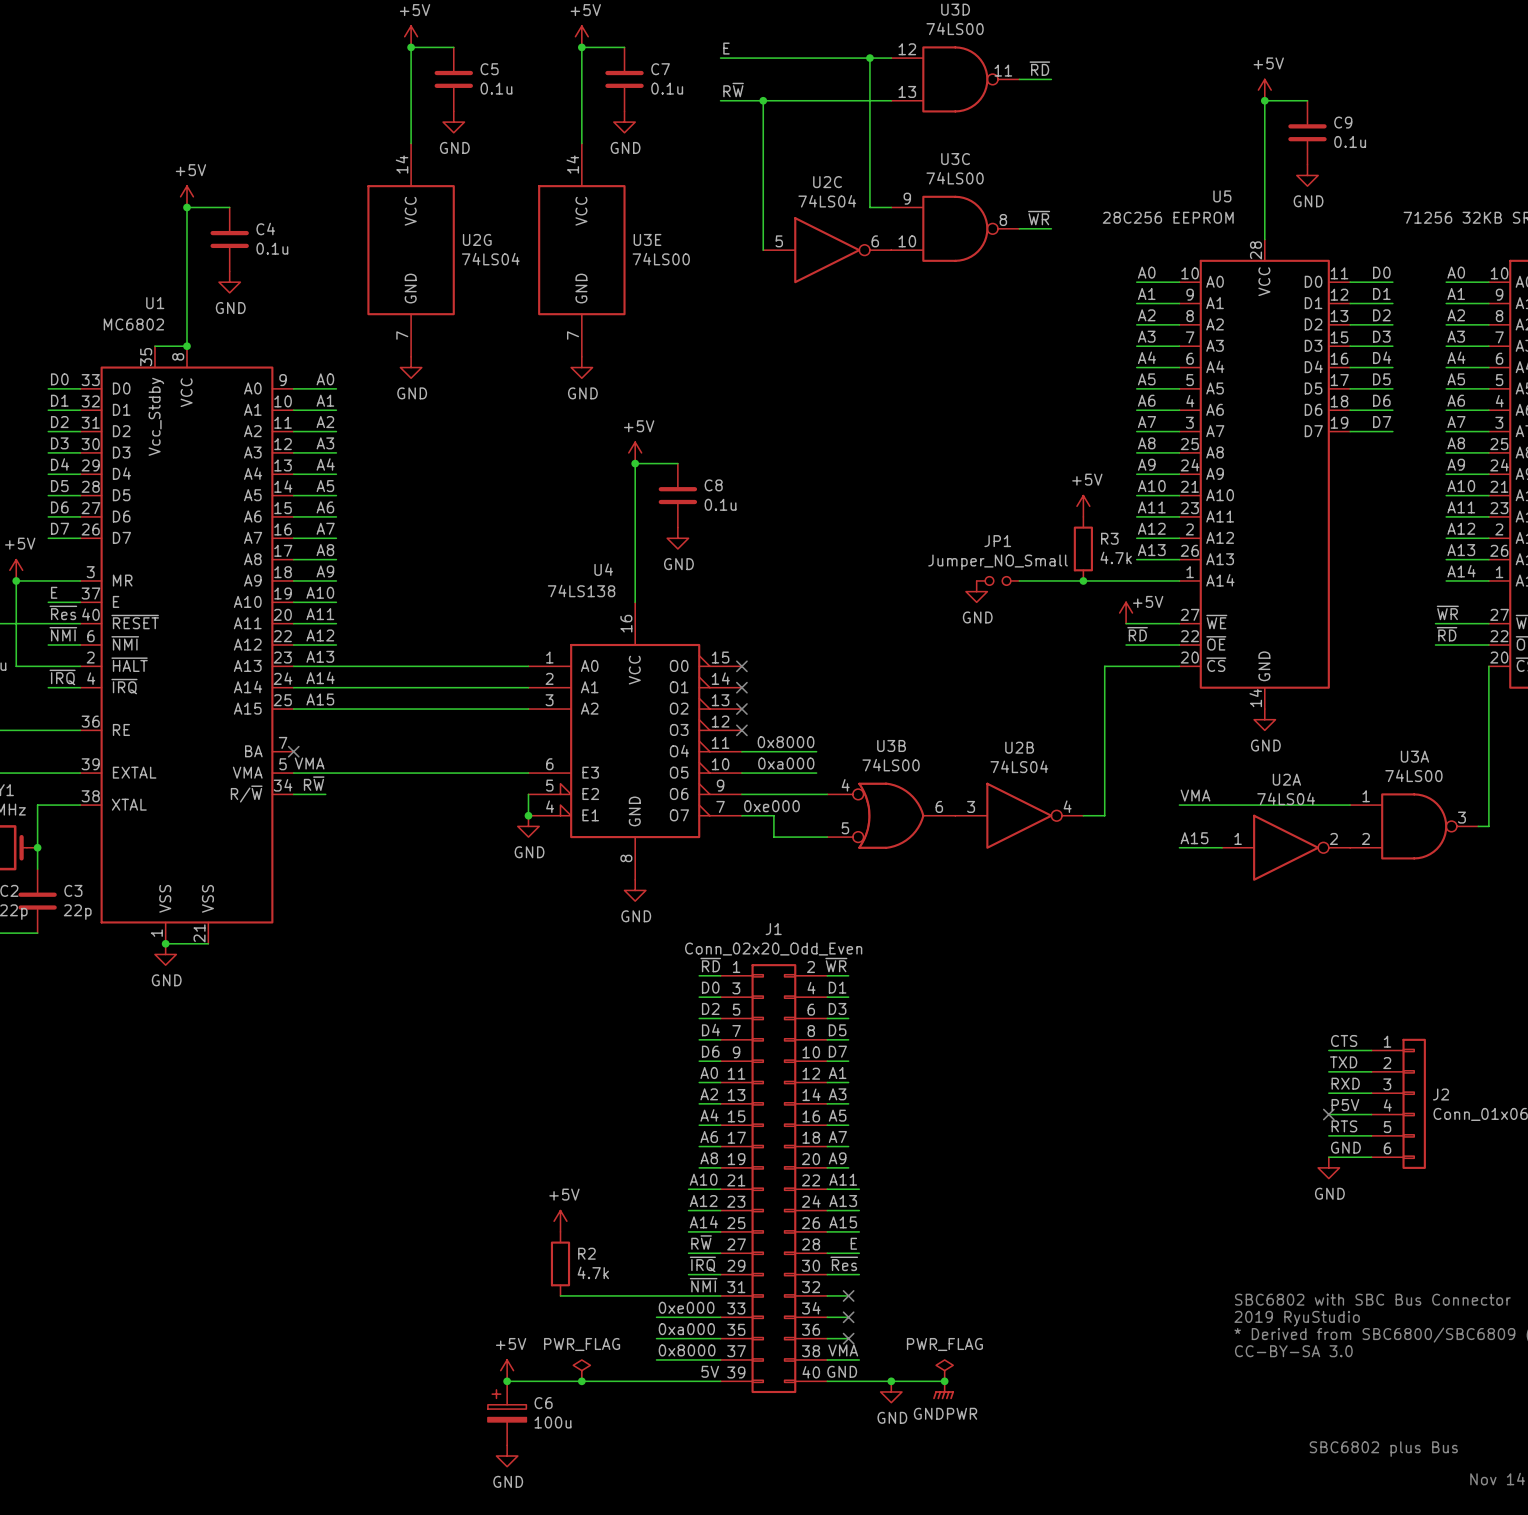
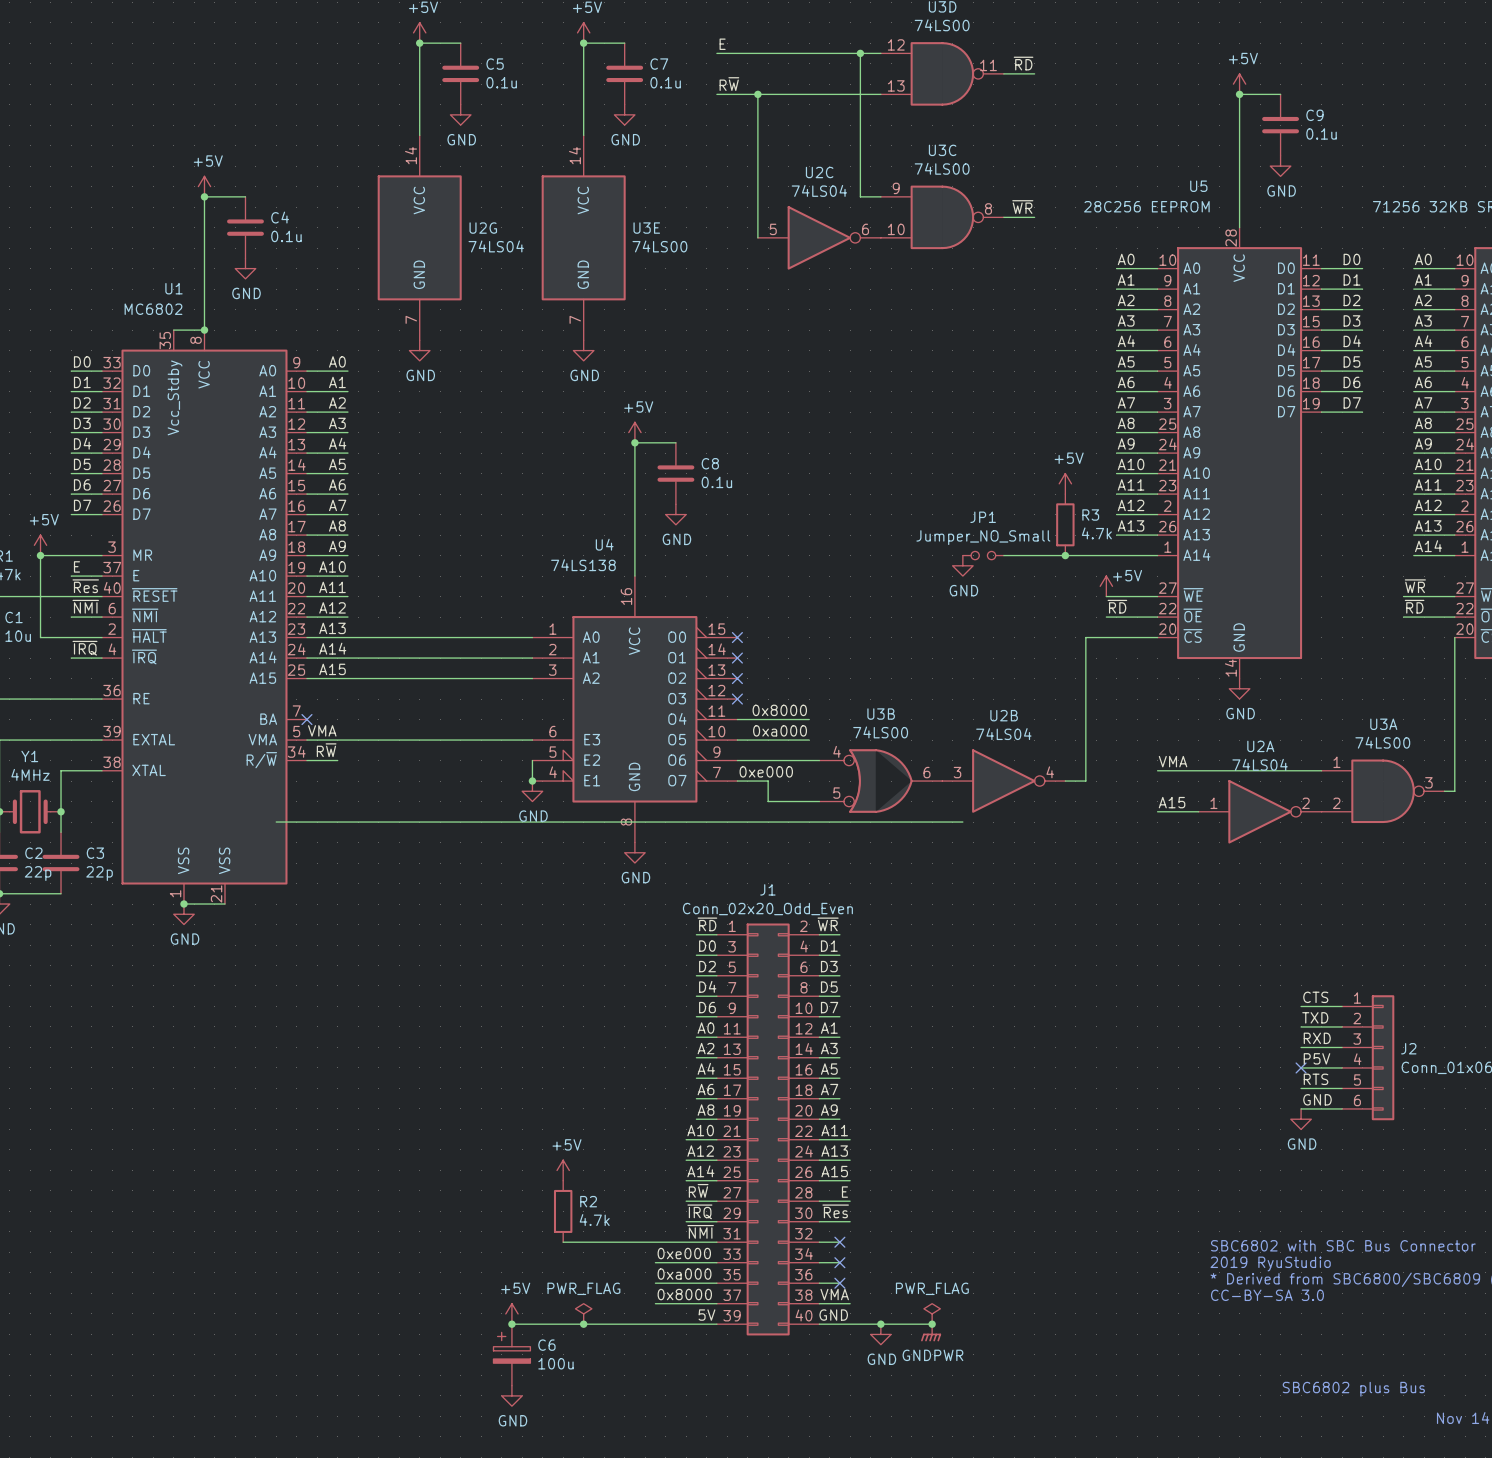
wire: none -> (276, 822) (962, 822)

